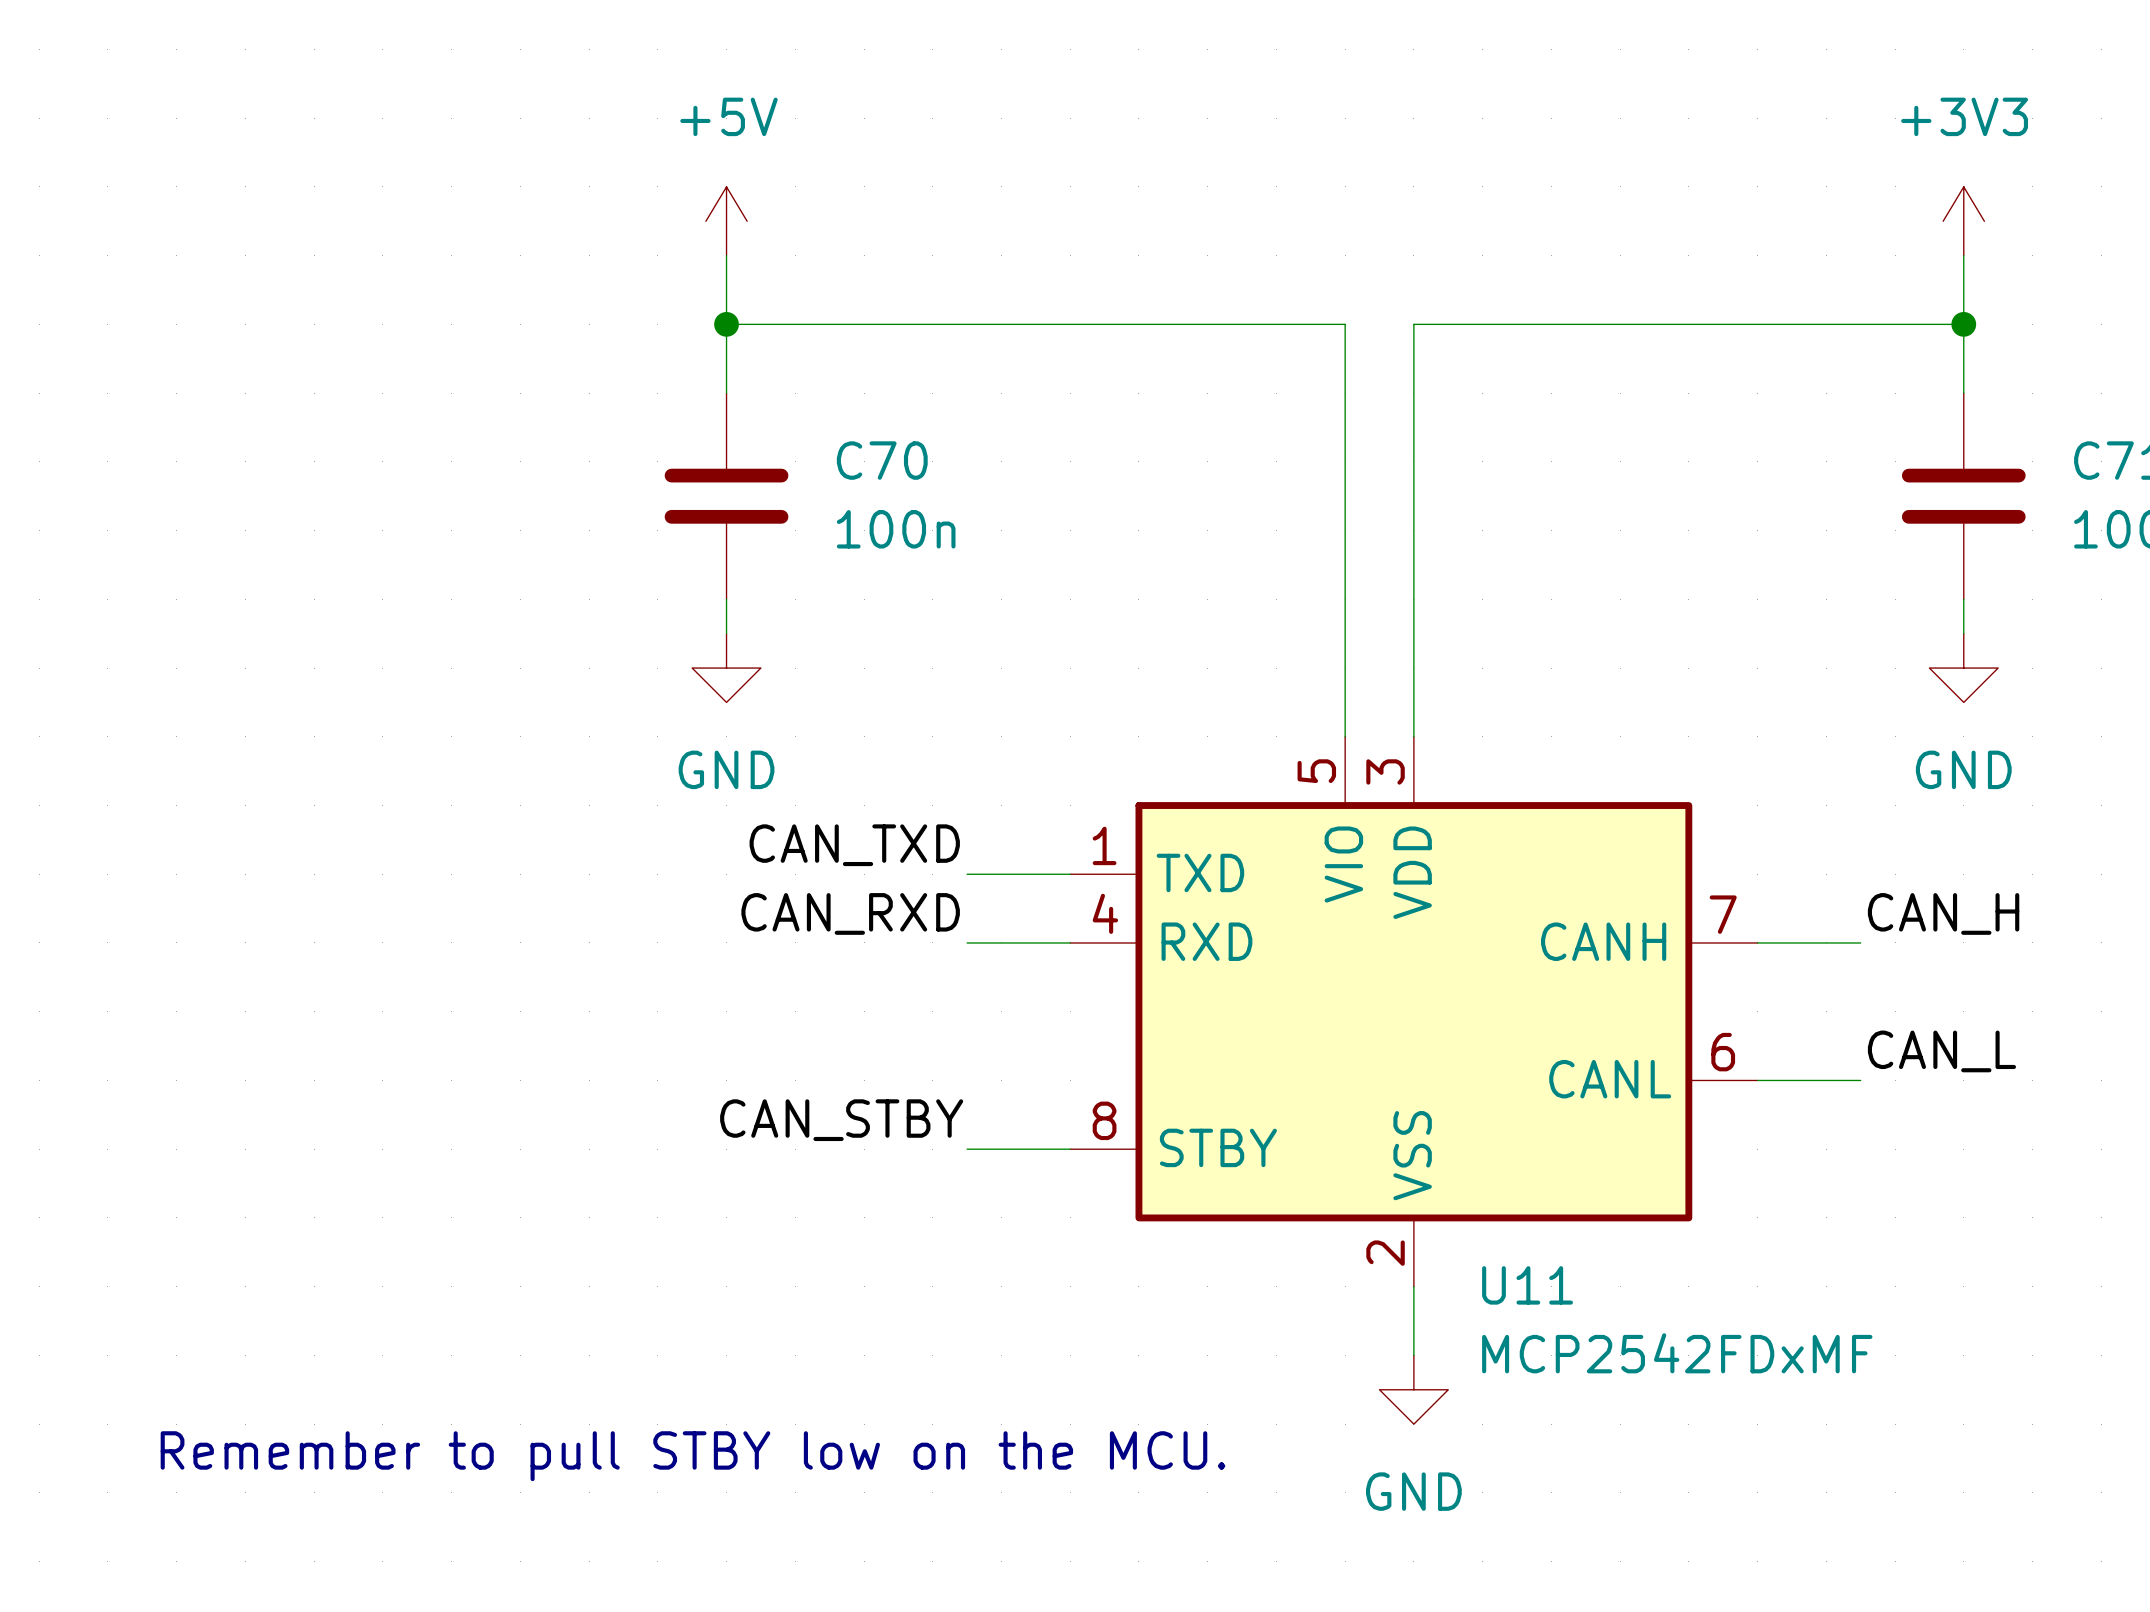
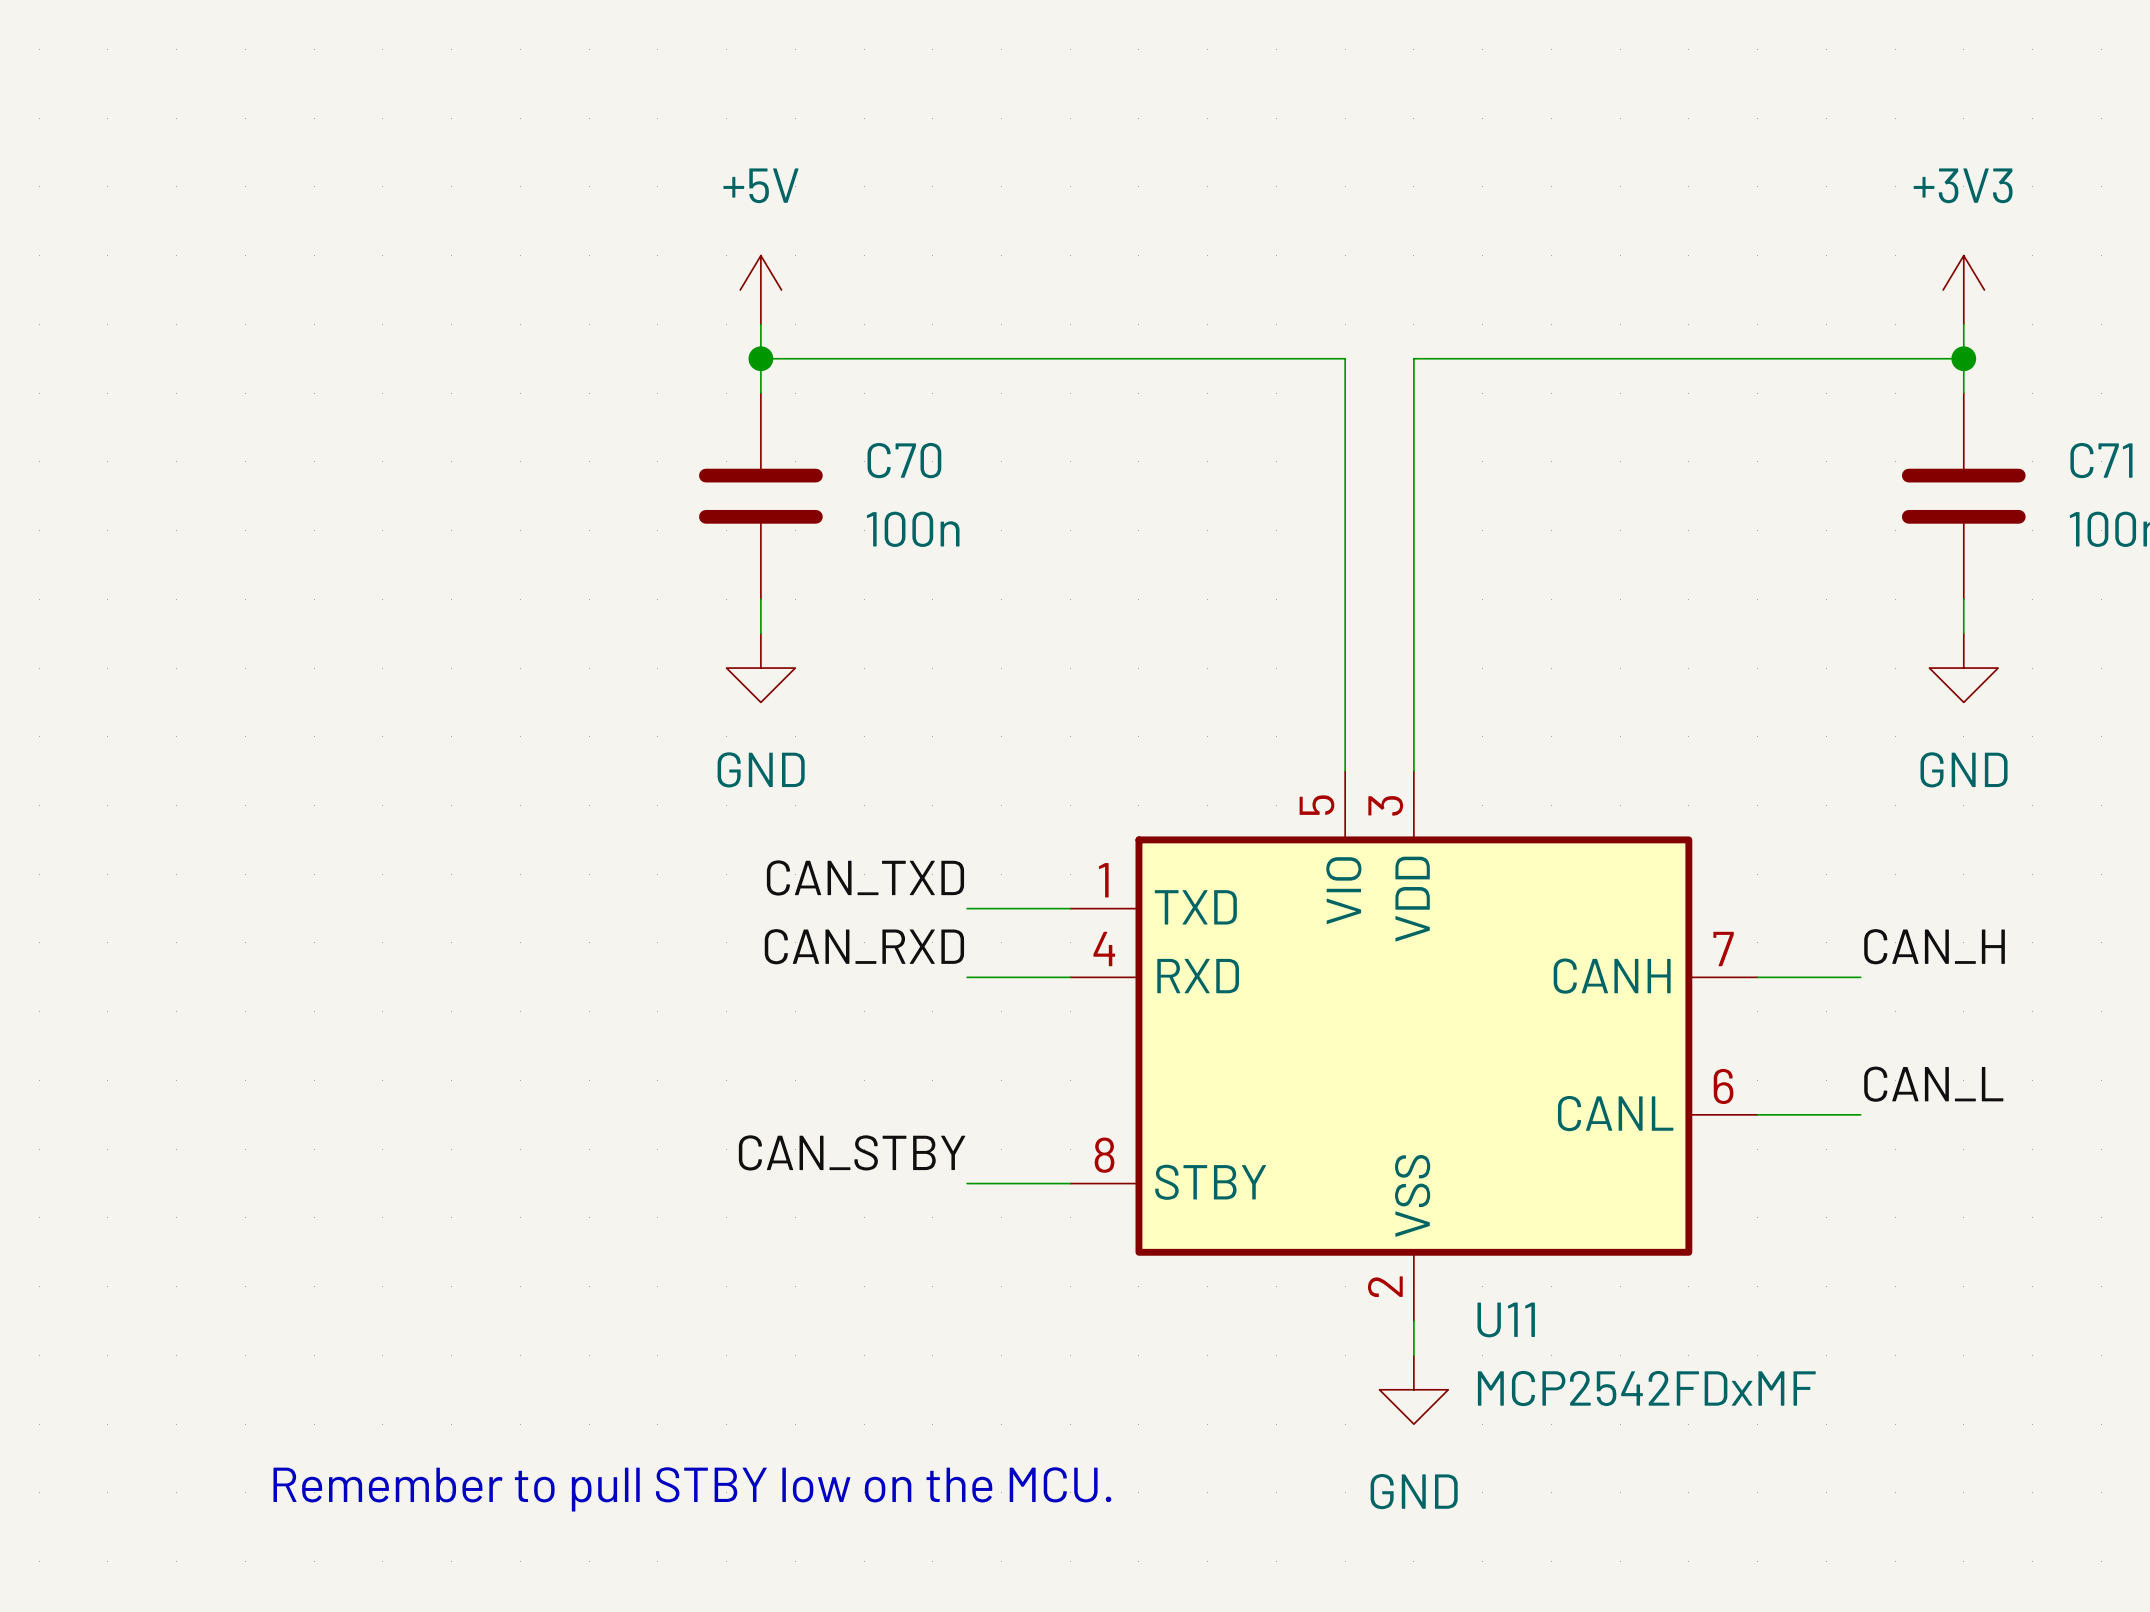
power symbol position: +5V (726, 221) -> +5V (760, 290)
power symbol position: +3V3 (1963, 221) -> +3V3 (1963, 290)
wire: (726, 255) (726, 393) -> none
wire: (1963, 255) (1963, 324) (1413, 324) (1413, 358) -> (1963, 358) (1413, 358)
wire: (726, 324) (1345, 324) (1345, 358) -> (760, 358) (1345, 358)
junction position: (726, 324) -> (760, 358)
wire: none -> (760, 324) (760, 393)
junction position: (1963, 324) -> (1963, 358)
C70 position: (726, 496) -> (760, 496)
wire: (726, 599) (726, 633) -> (760, 599) (760, 633)
power symbol position: GND (726, 668) -> GND (760, 668)
label position: CAN_TXD (854, 845) -> CAN_TXD (865, 877)
wire: (967, 874) (1070, 874) -> (967, 908) (1070, 908)
label position: CAN_RXD (850, 913) -> CAN_RXD (864, 946)
label position: CAN_H (1943, 913) -> CAN_H (1934, 946)
wire: (967, 942) (1070, 942) -> (967, 977) (1070, 977)
wire: (1757, 942) (1860, 942) -> (1757, 977) (1860, 977)
U11 position: (1413, 1011) -> (1413, 1046)
label position: CAN_L (1941, 1051) -> CAN_L (1933, 1084)
wire: (1757, 1080) (1860, 1080) -> (1757, 1114) (1860, 1114)
label position: CAN_STBY (841, 1120) -> CAN_STBY (852, 1152)
wire: (967, 1149) (1070, 1149) -> (967, 1183) (1070, 1183)
text position: Remember to pull STBY low on the MCU. (692, 1456) -> Remember to pull STBY low on the MCU. (692, 1489)

